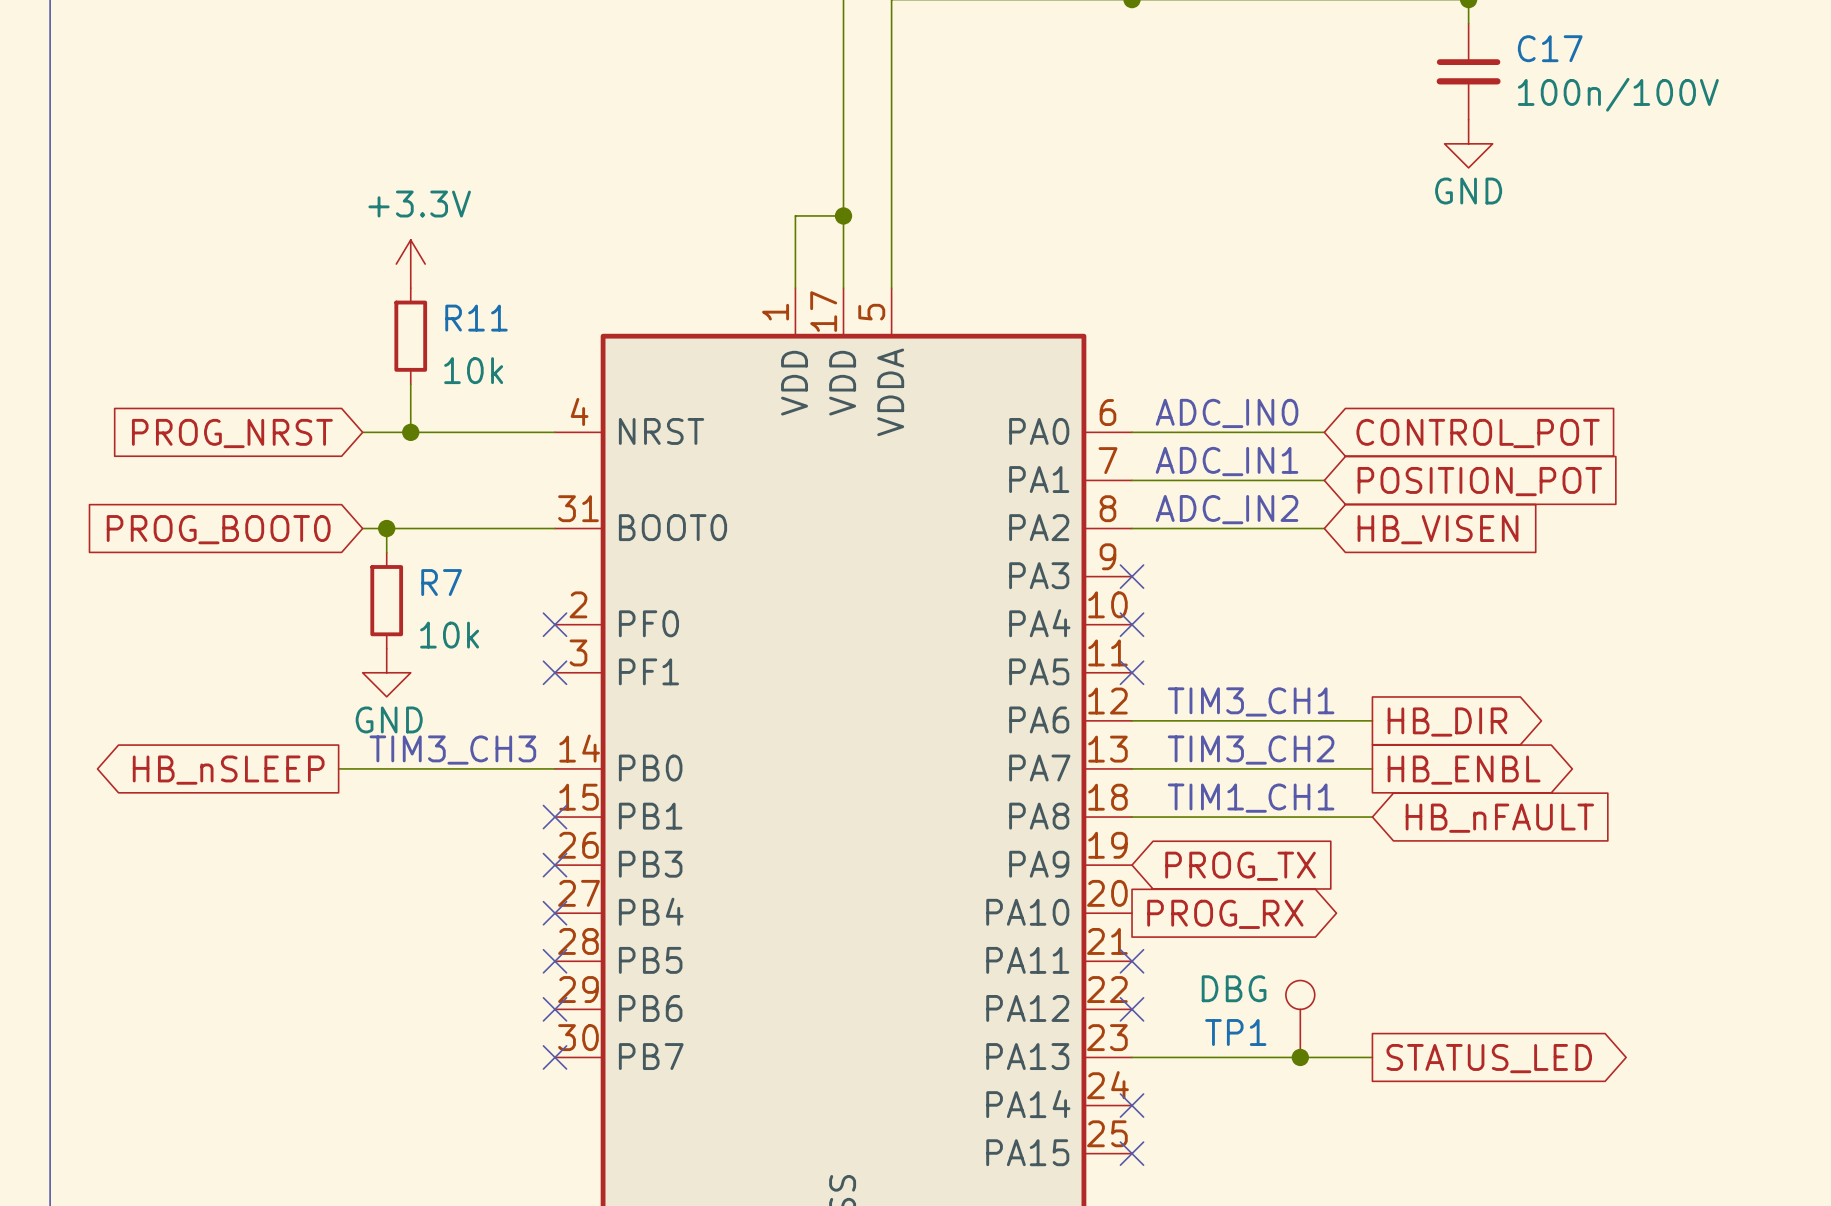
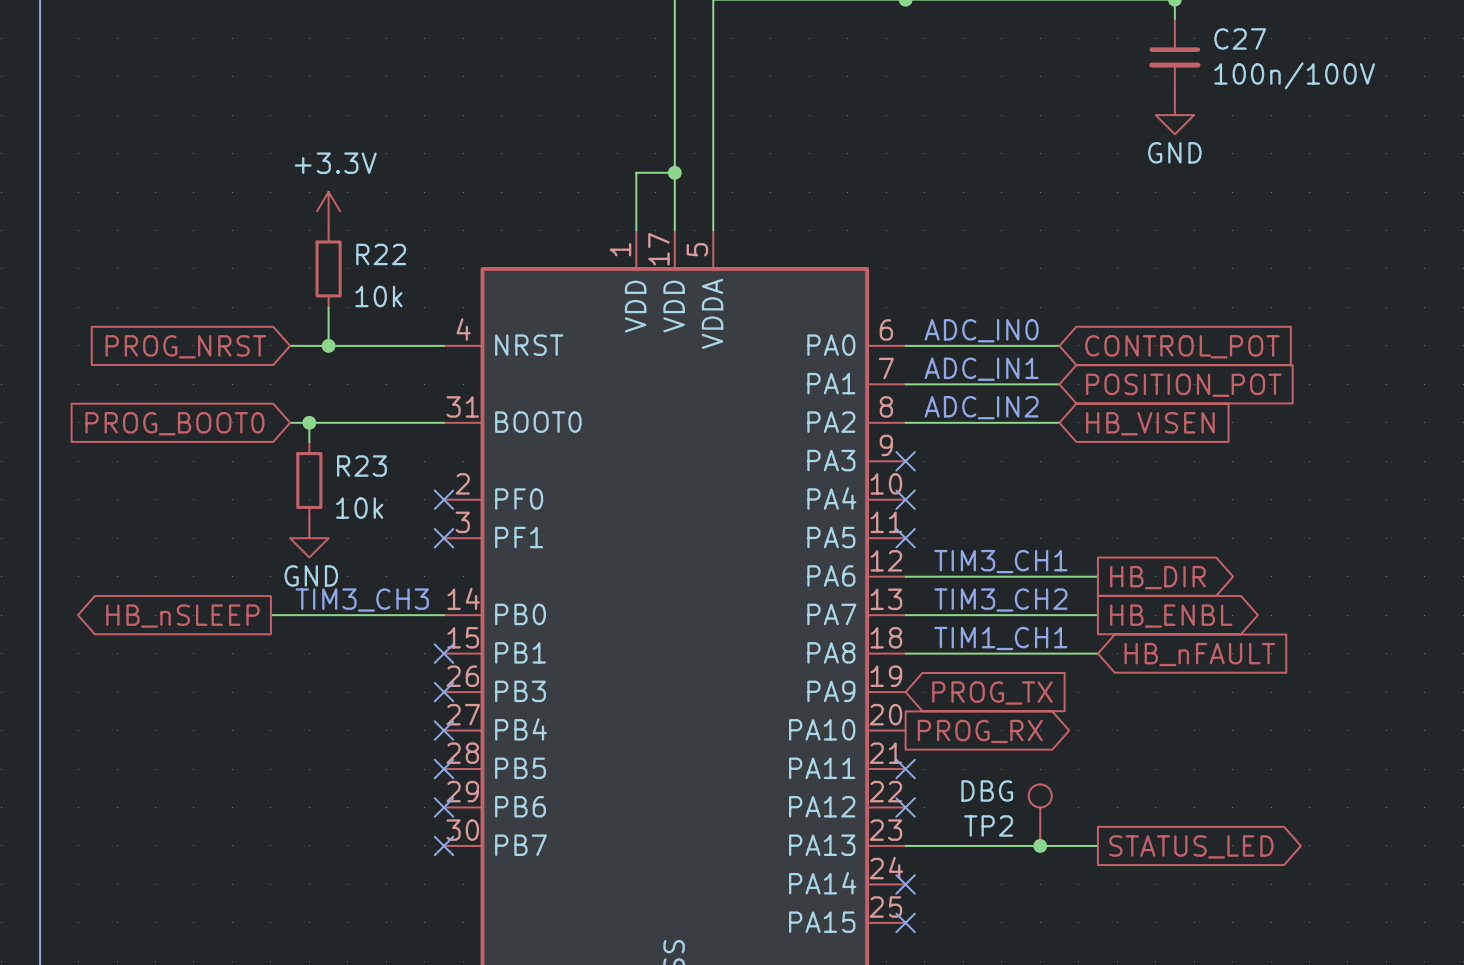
C17 name: C17 (1550, 48) -> C27 (1240, 38)
R11 name: R11 (476, 318) -> R22 (381, 254)
R7 name: R7 (441, 582) -> R23 (361, 466)
TP1 name: TP1 (1235, 1032) -> TP2 (988, 826)

